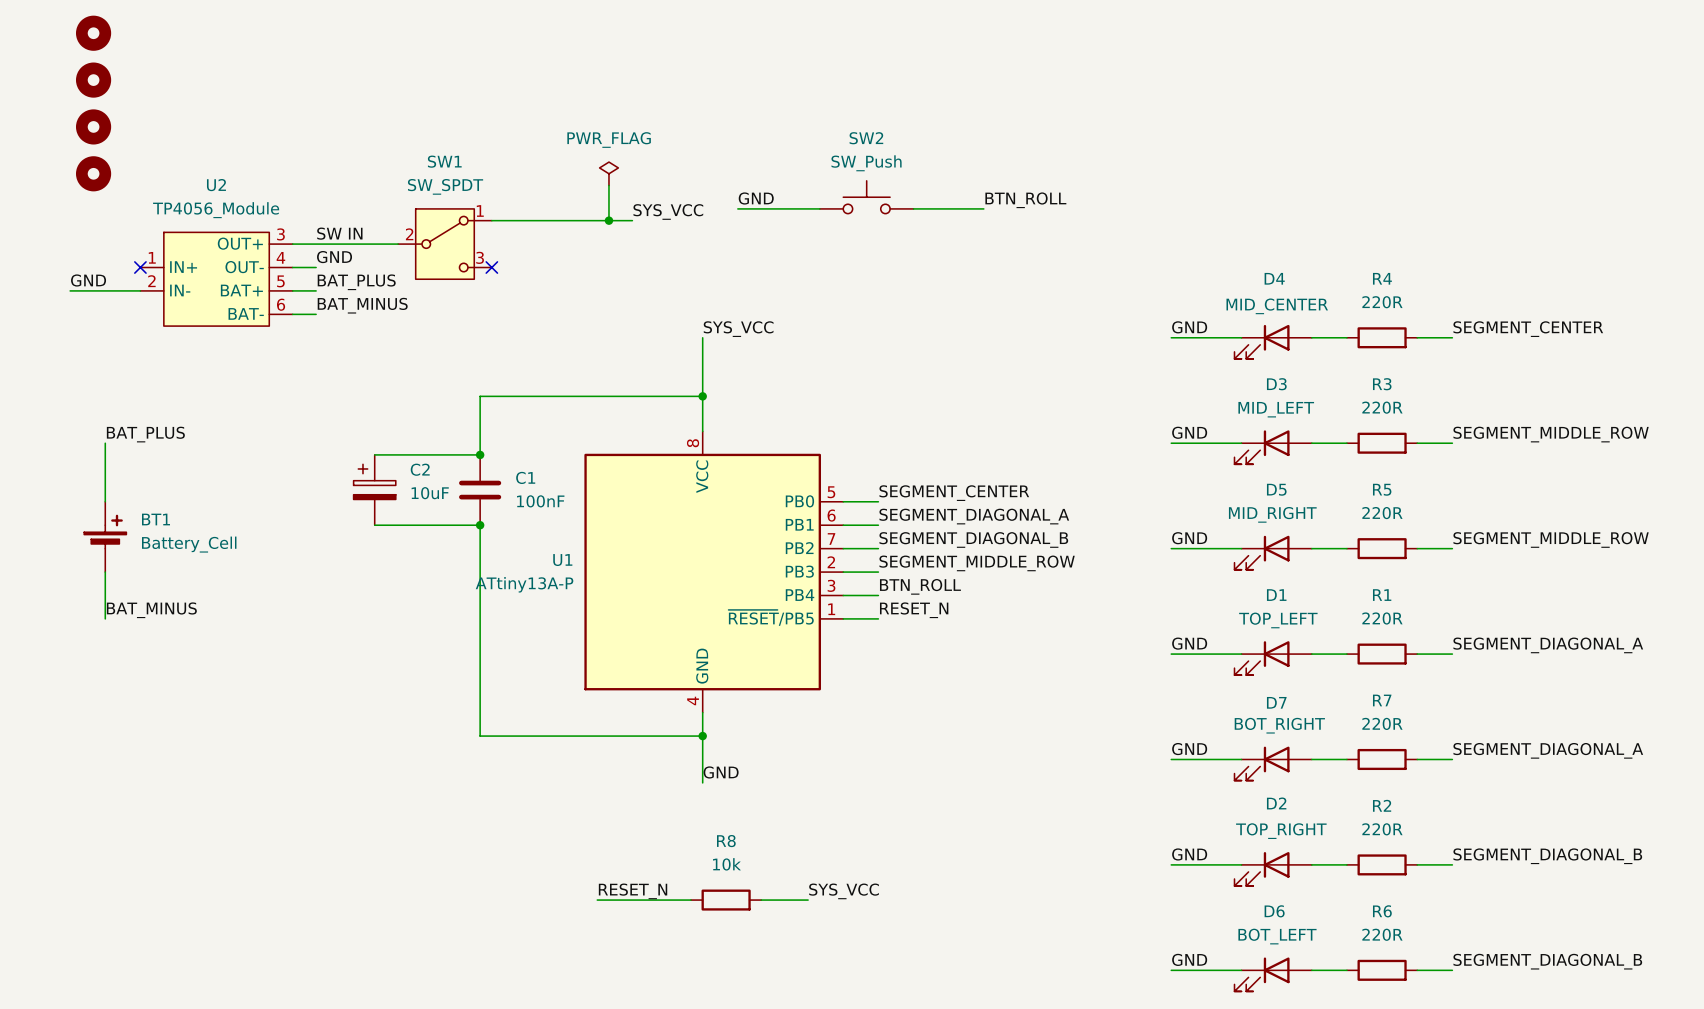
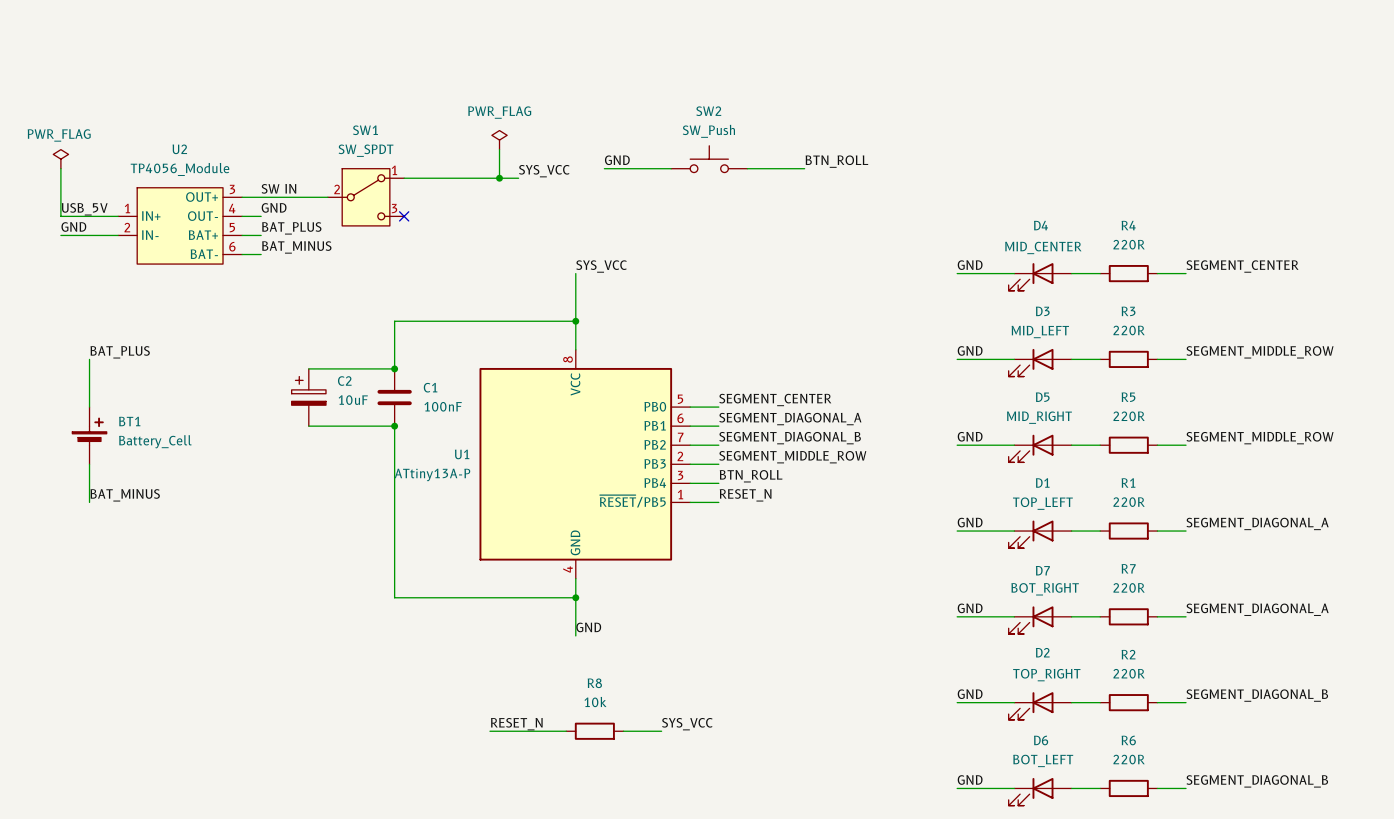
part: (93, 33) -> none
part: (93, 80) -> none
part: (93, 126) -> none
part: (93, 173) -> none
power symbol: none -> PWR_FLAG (60, 159)
wire: none -> (60, 168) (60, 216) (118, 216)
label: none -> USB_5V (84, 209)
no-connect mark: (140, 267) -> none

